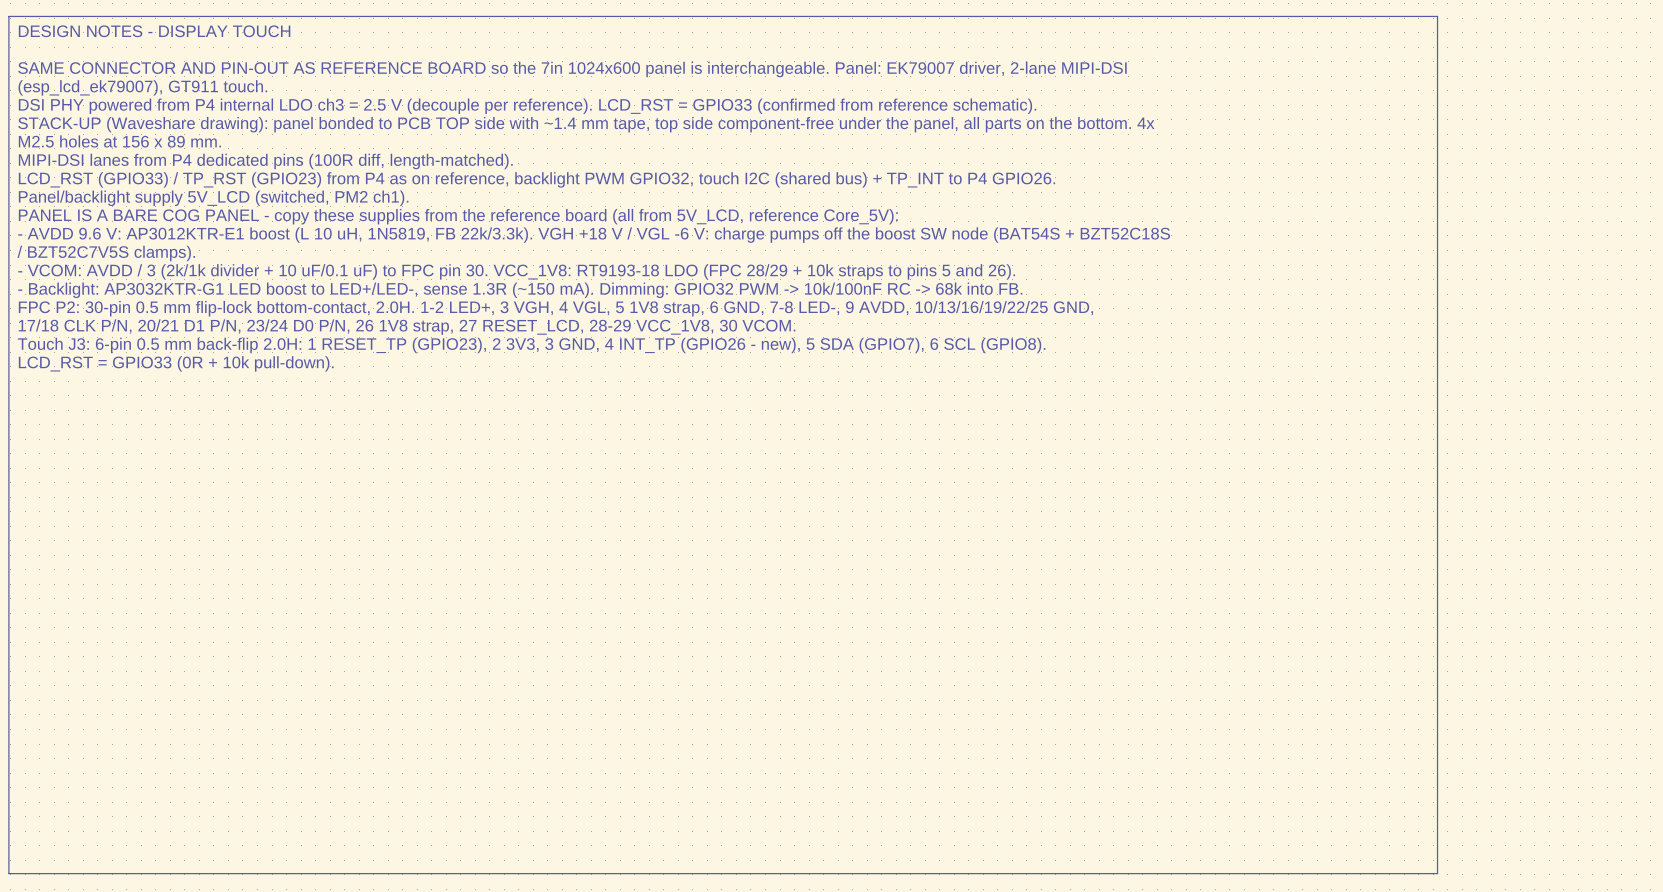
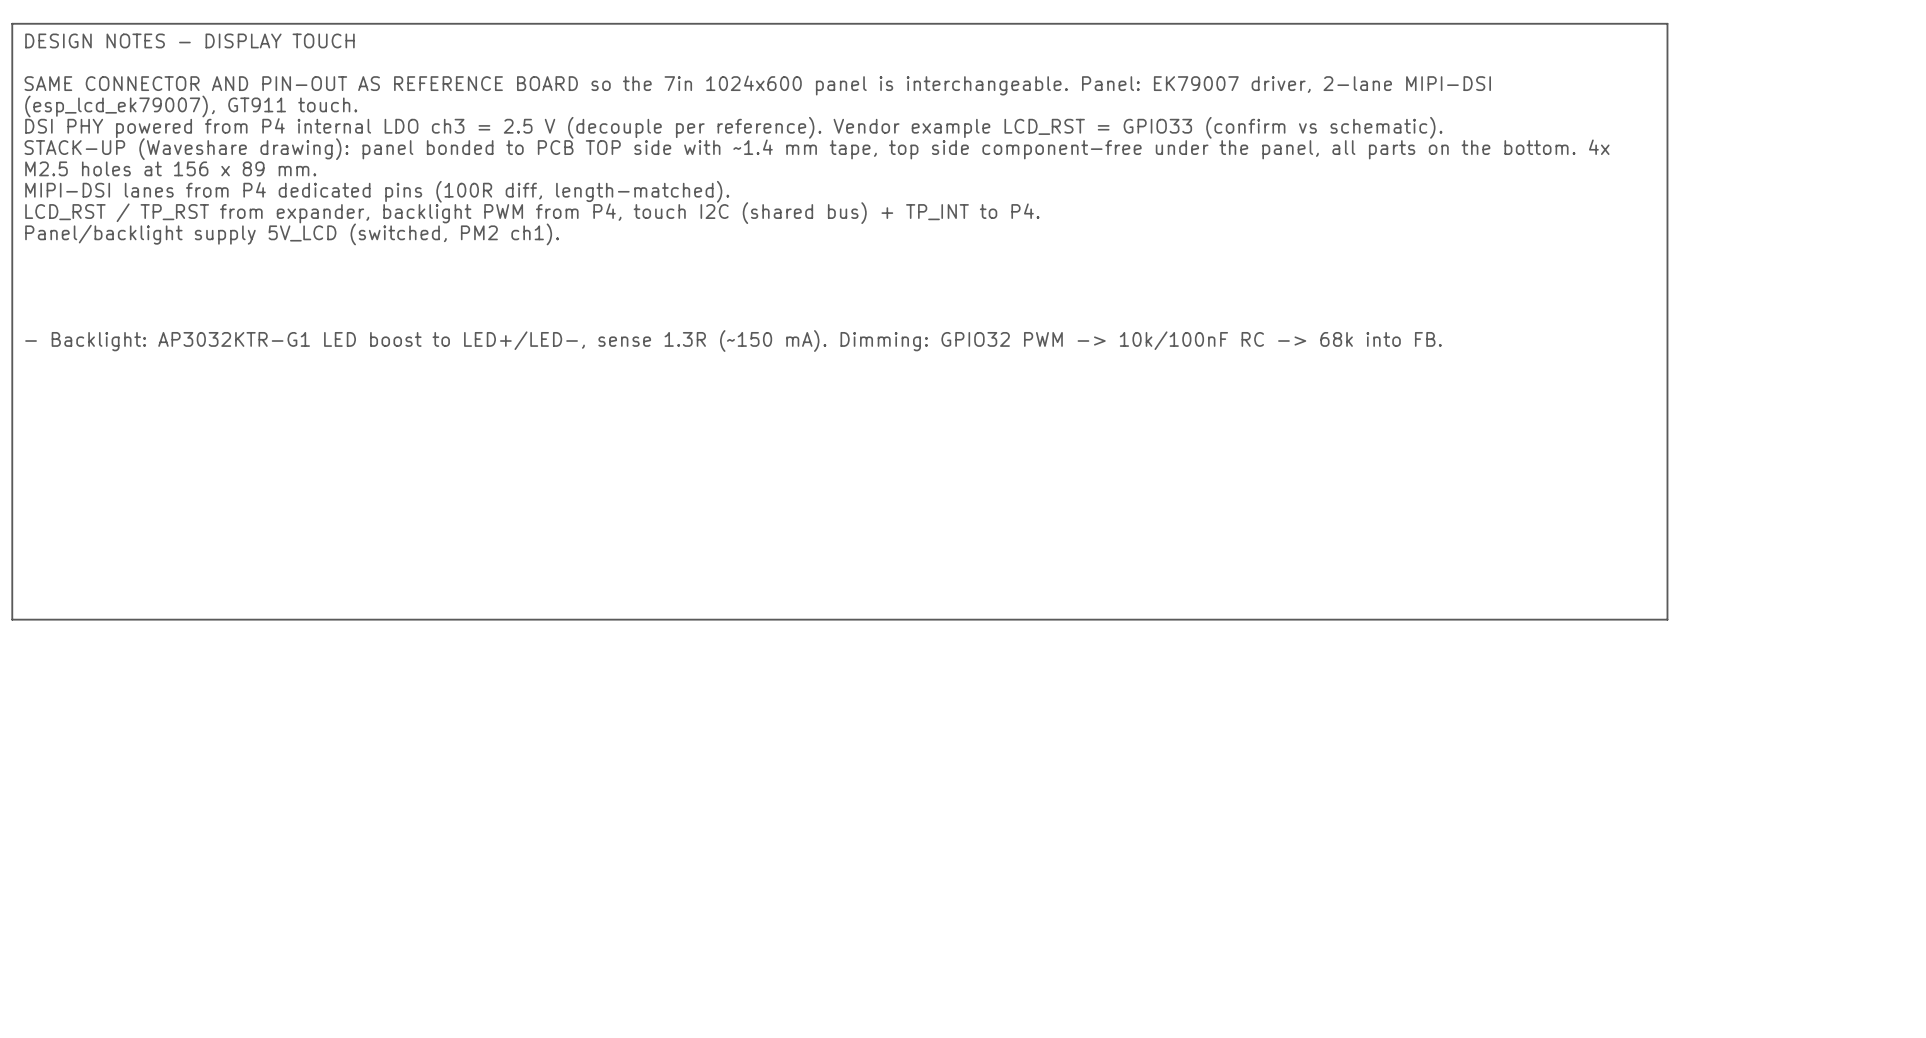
text: DSI PHY powered from P4 internal LDO ch3 = 2.5 V (decouple per reference). LCD_RST = GPIO33 (confirmed from reference schematic). (527, 106) -> DSI PHY powered from P4 internal LDO ch3 = 2.5 V (decouple per reference). Vendor example LCD_RST = GPIO33 (confirm vs schematic). (733, 127)
text: LCD_RST (GPIO33) / TP_RST (GPIO23) from P4 as on reference, backlight PWM GPIO32, touch I2C (shared bus) + TP_INT to P4 GPIO26. (536, 179) -> LCD_RST / TP_RST from expander, backlight PWM from P4, touch I2C (shared bus) + TP_INT to P4. (532, 213)
text: PANEL IS A BARE COG PANEL - copy these supplies from the reference board (all from 5V_LCD, reference Core_5V): (458, 216) -> none
text: - AVDD 9.6 V: AP3012KTR-E1 boost (L 10 uH, 1N5819, FB 22k/3.3k). VGH +18 V / VGL -6 V: charge pumps off the boost SW node (BAT54S + BZT52C18S (594, 235) -> none
text: / BZT52C7V5S clamps). (106, 253) -> none
text: - VCOM: AVDD / 3 (2k/1k divider + 10 uF/0.1 uF) to FPC pin 30. VCC_1V8: RT9193-18 LDO (FPC 28/29 + 10k straps to pins 5 and 26). (516, 271) -> none
text: FPC P2: 30-pin 0.5 mm flip-lock bottom-contact, 2.0H. 1-2 LED+, 3 VGH, 4 VGL, 5 1V8 strap, 6 GND, 7-8 LED-, 9 AVDD, 10/13/16/19/22/25 GND, (555, 308) -> none
text: 17/18 CLK P/N, 20/21 D1 P/N, 23/24 D0 P/N, 26 1V8 strap, 27 RESET_LCD, 28-29 VCC_1V8, 30 VCOM. (407, 327) -> none
text: Touch J3: 6-pin 0.5 mm back-flip 2.0H: 1 RESET_TP (GPIO23), 2 3V3, 3 GND, 4 INT_TP (GPIO26 - new), 5 SDA (GPIO7), 6 SCL (GPIO8). (531, 345) -> none
text: LCD_RST = GPIO33 (0R + 10k pull-down). (176, 363) -> none
line: (8, 530) (8, 873) (1437, 873) (1437, 530) -> (12, 619) (1667, 619)

